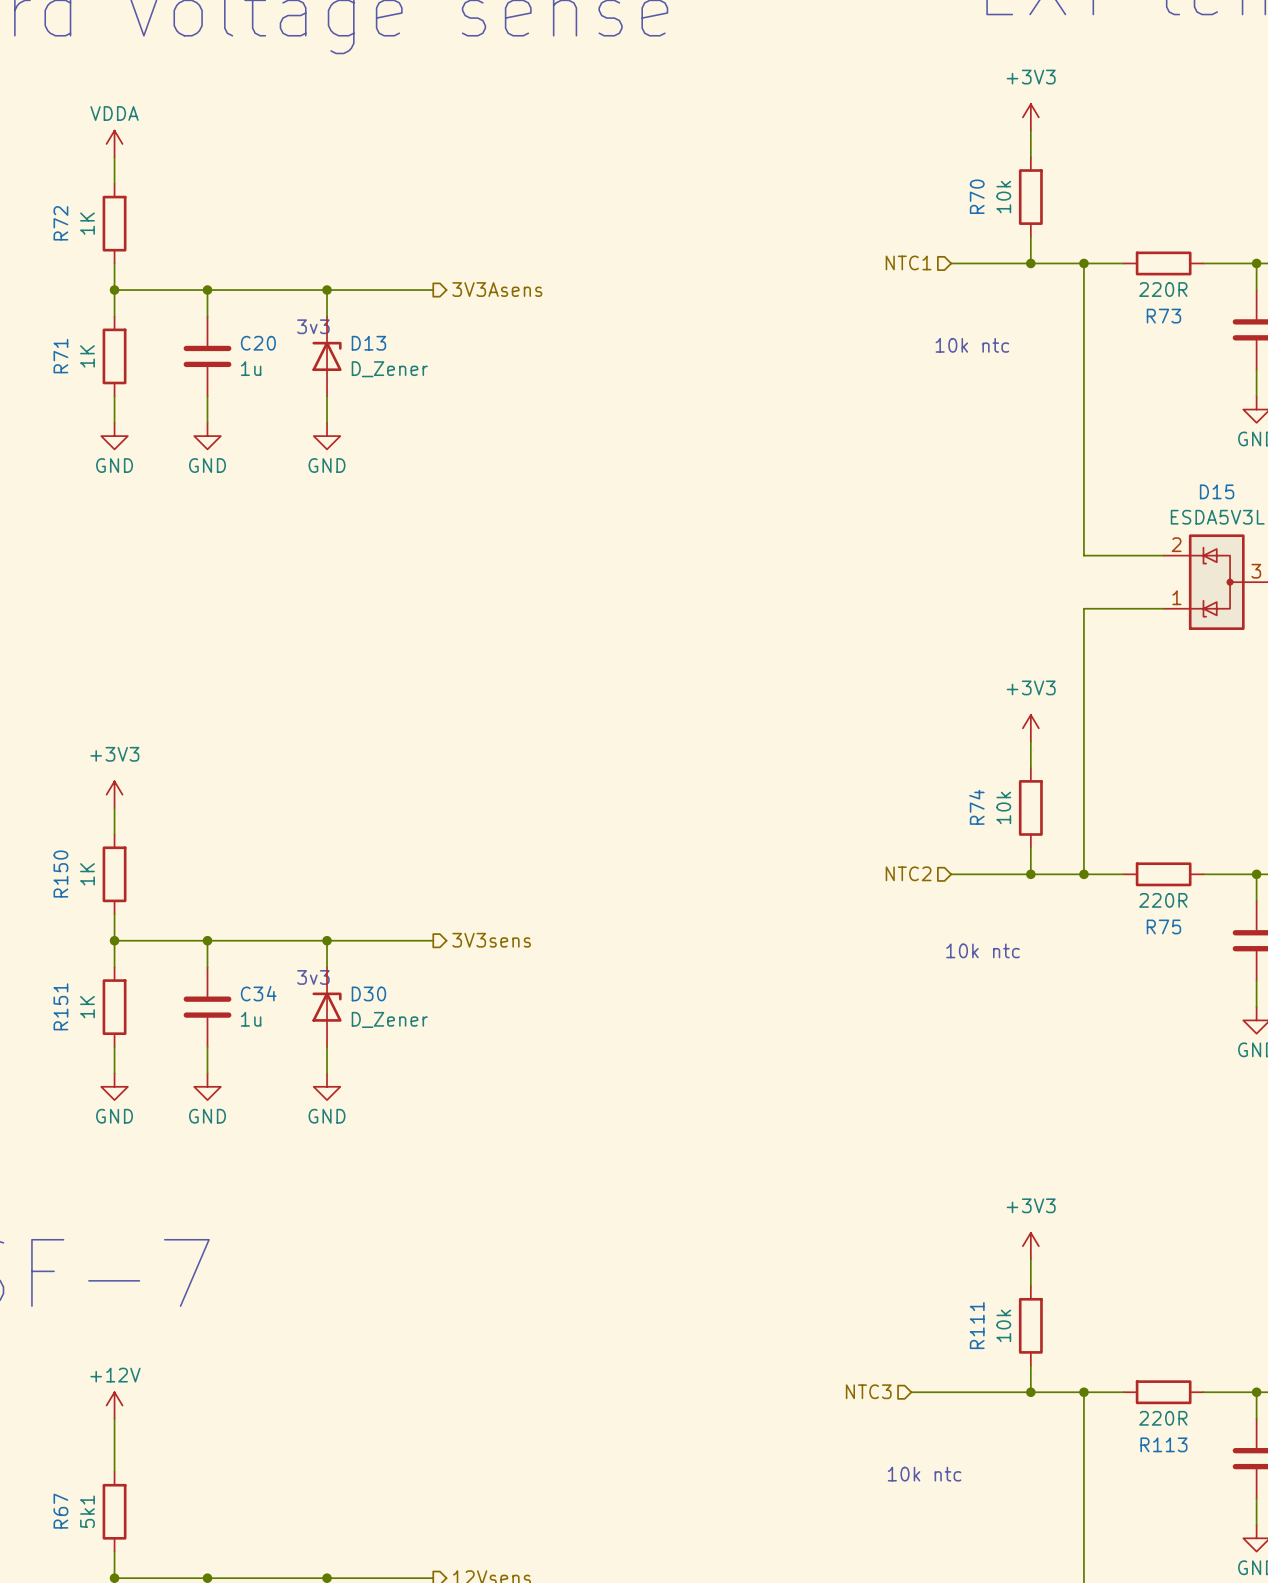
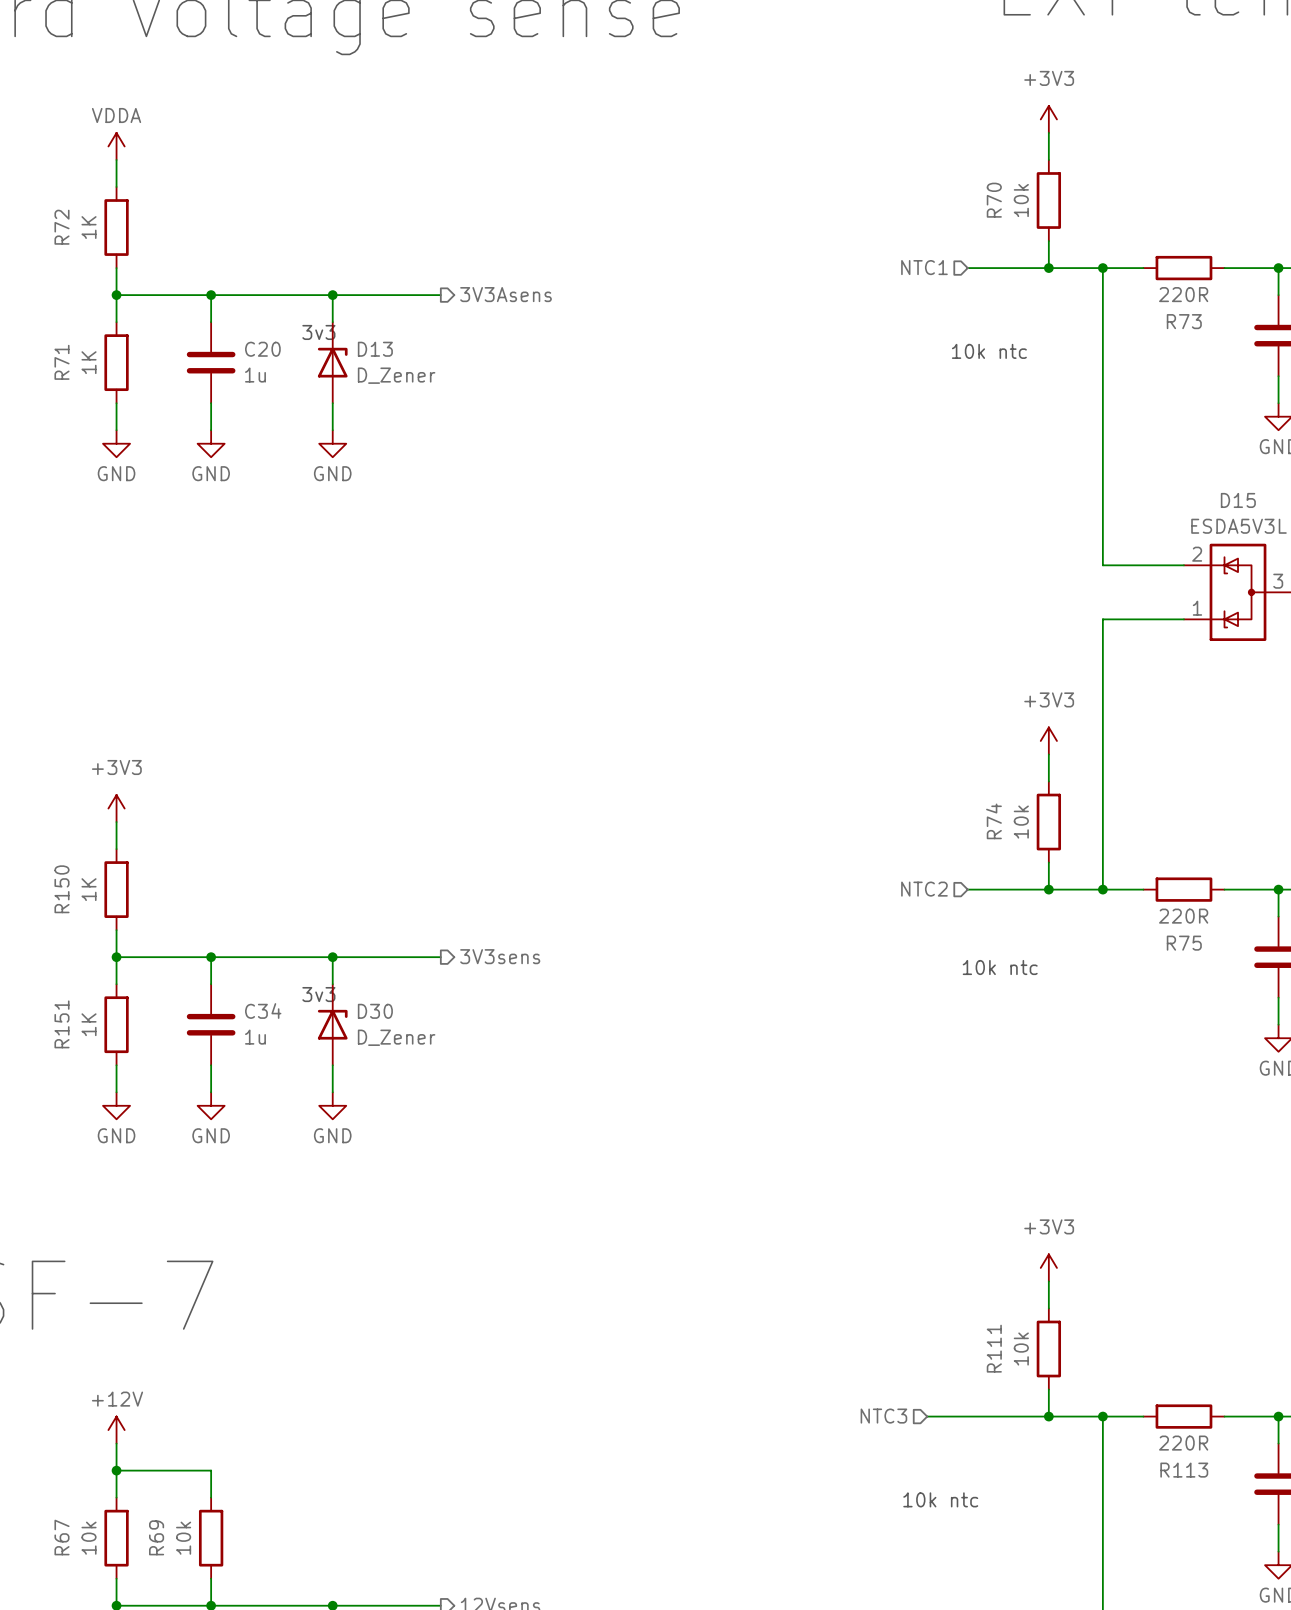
wire: none -> (116, 1470) (211, 1470) (211, 1497)
junction: none -> (116, 1470)
R67 value: 5k1 (87, 1511) -> 10k (89, 1538)
R69: none -> 10k (211, 1538)
wire: none -> (211, 1578) (211, 1605)

